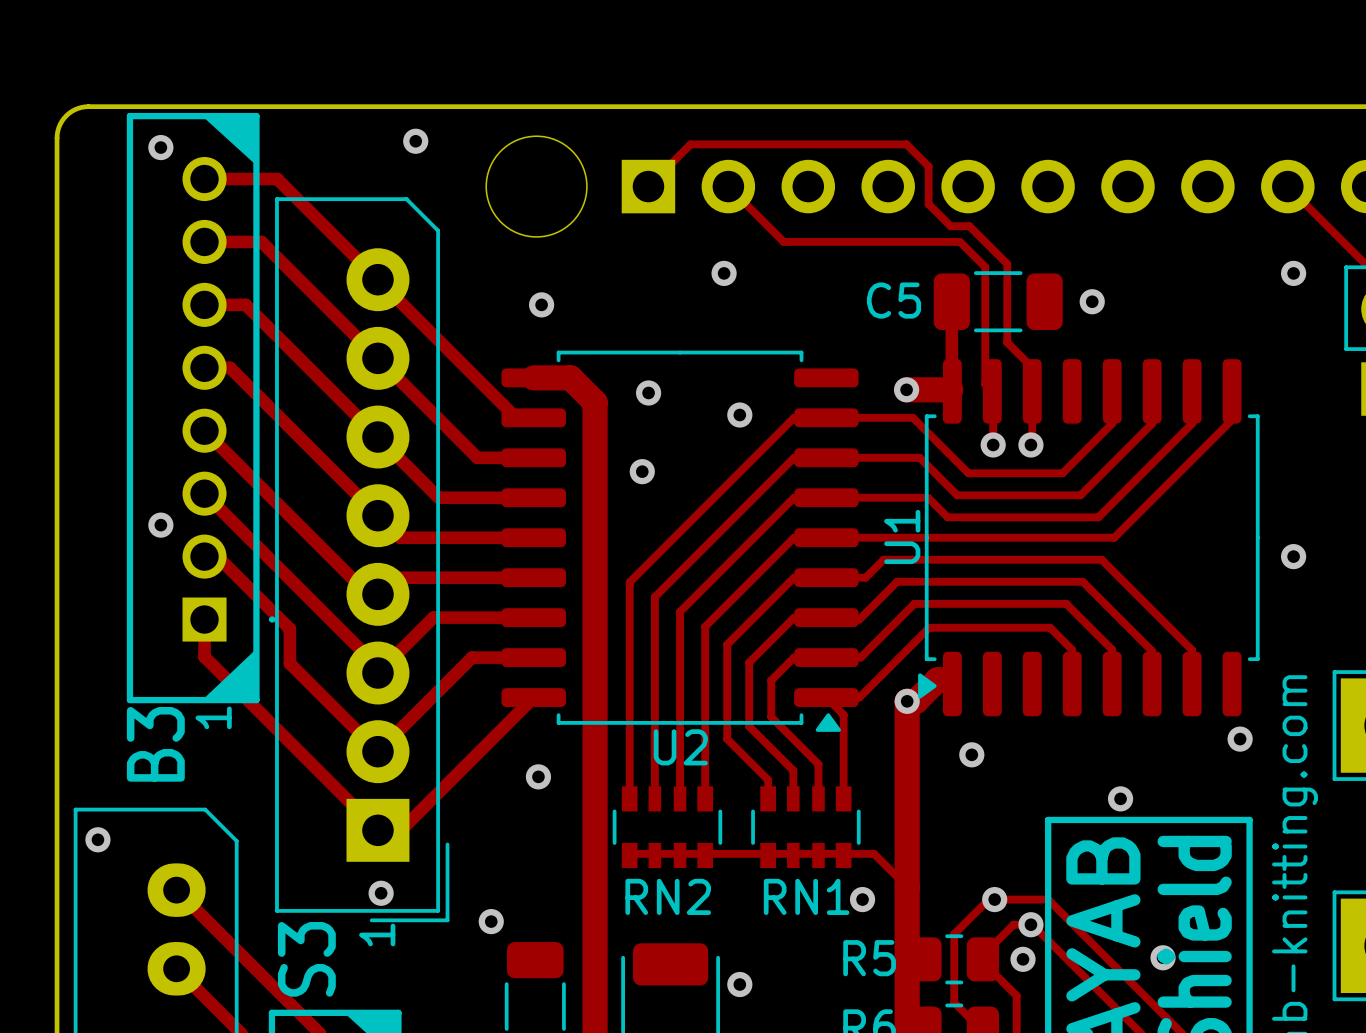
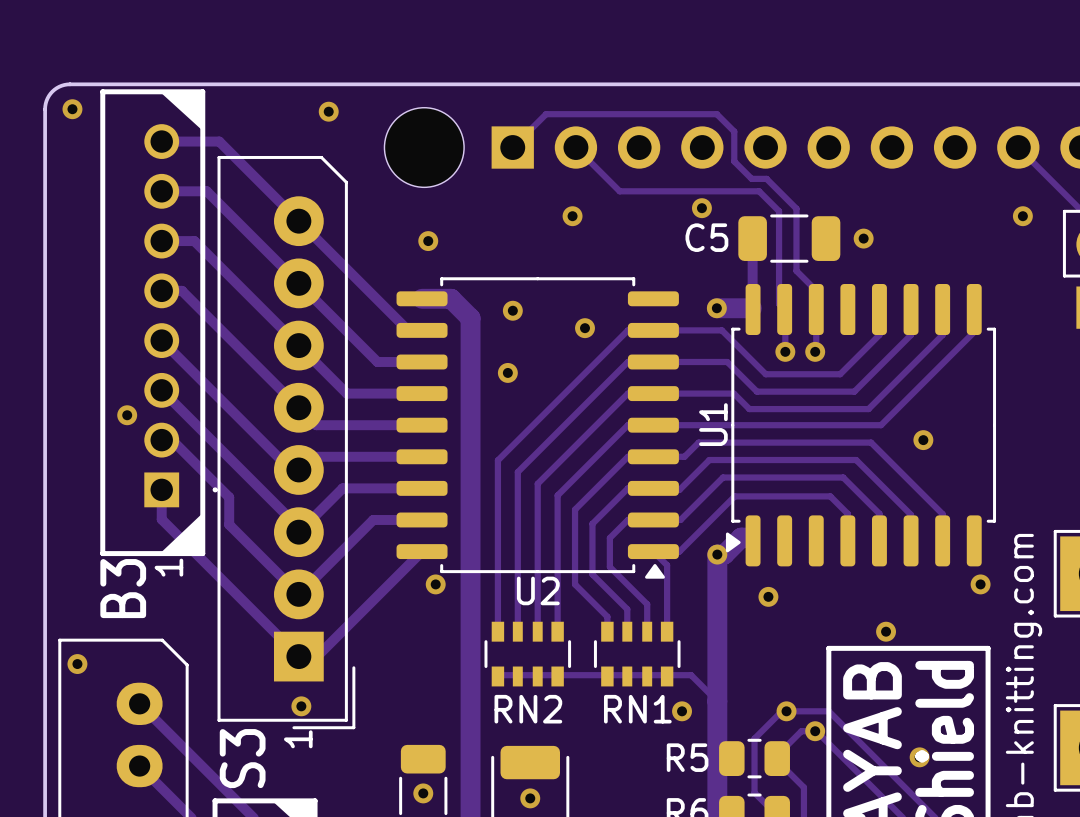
via position: (160, 147) -> (72, 109)
via: none -> (701, 208)
via position: (1293, 556) -> (923, 440)
via position: (538, 776) -> (435, 584)
via position: (491, 921) -> (423, 793)
via: (1023, 959) -> none
via: (739, 984) -> none
via: none -> (530, 798)

